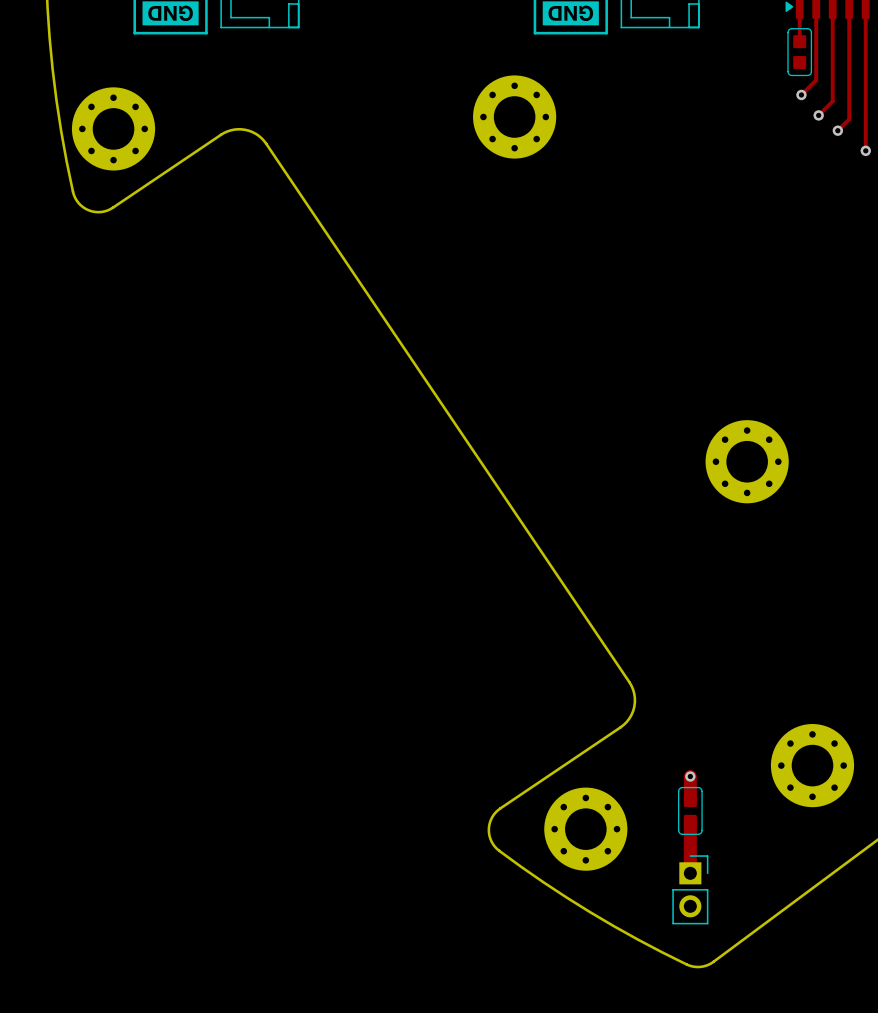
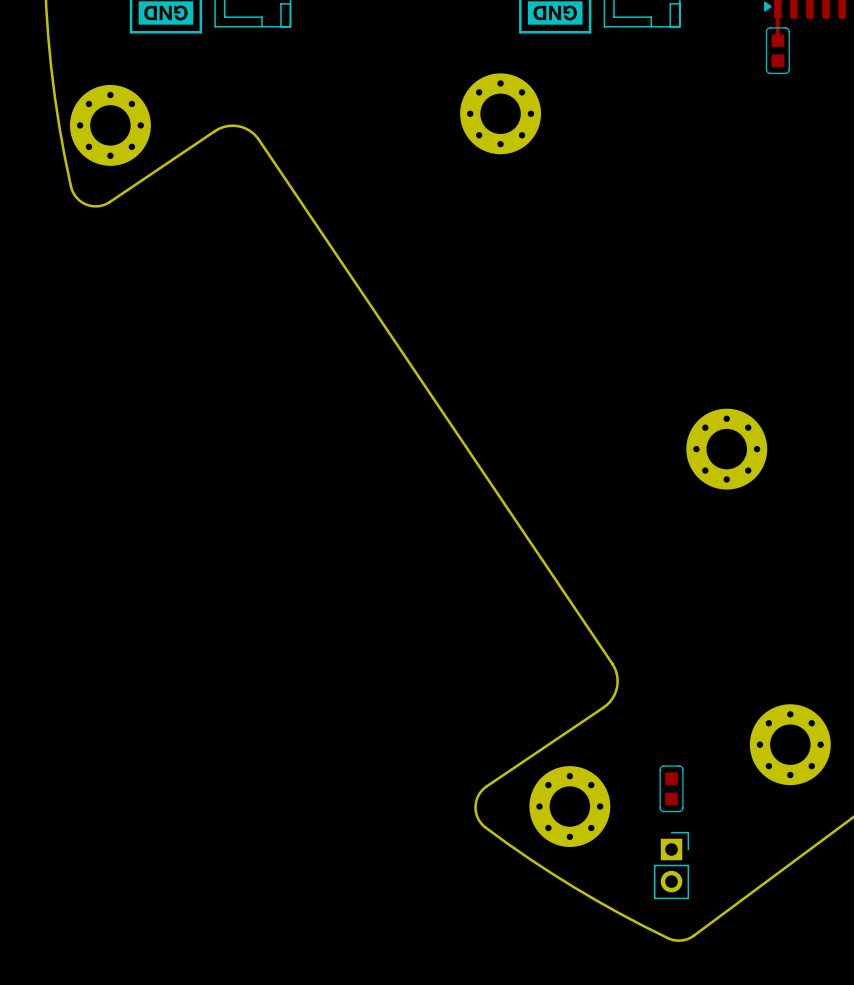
track: (816, 5) (816, 80) (800, 95) -> none
track: (832, 5) (832, 101) (818, 115) -> none
track: (849, 5) (849, 119) (837, 130) -> none
track: (865, 5) (865, 150) -> none
via: (801, 94) -> none
via: (818, 115) -> none
via: (837, 130) -> none
via: (865, 150) -> none
via: (690, 776) -> none
track: (690, 778) (690, 776) (690, 800) -> none
track: (690, 821) (690, 873) -> none

